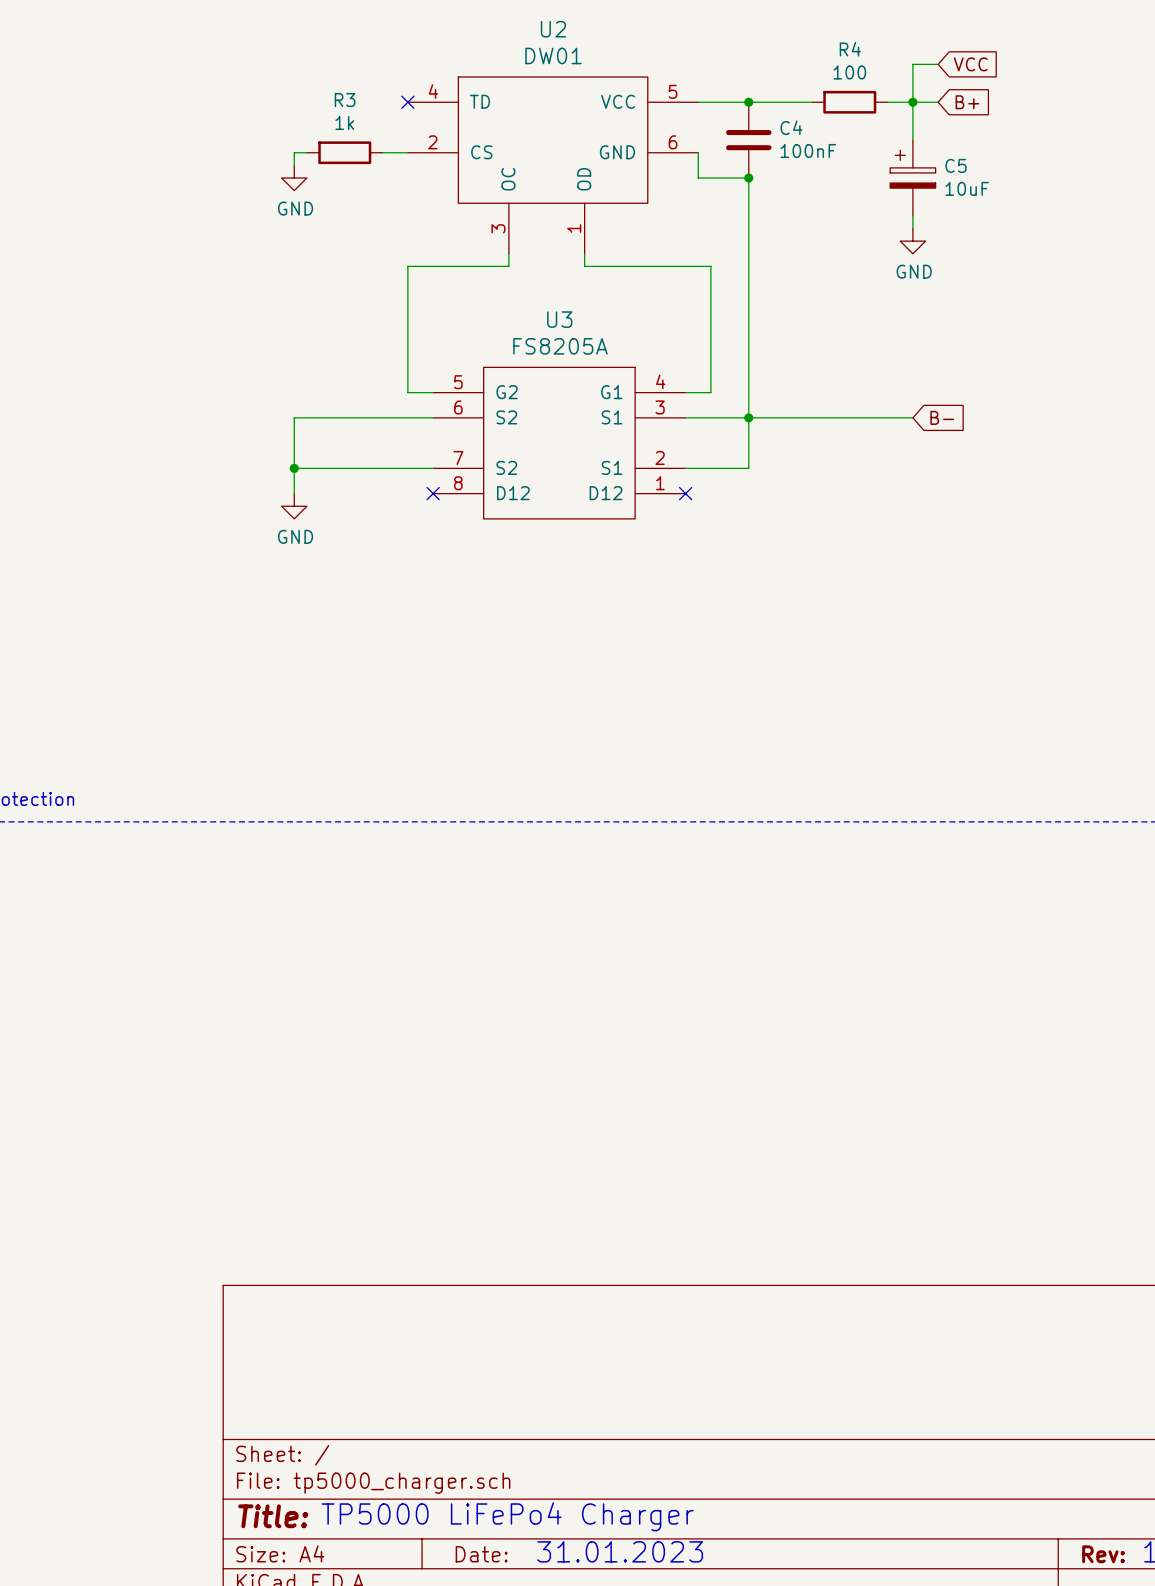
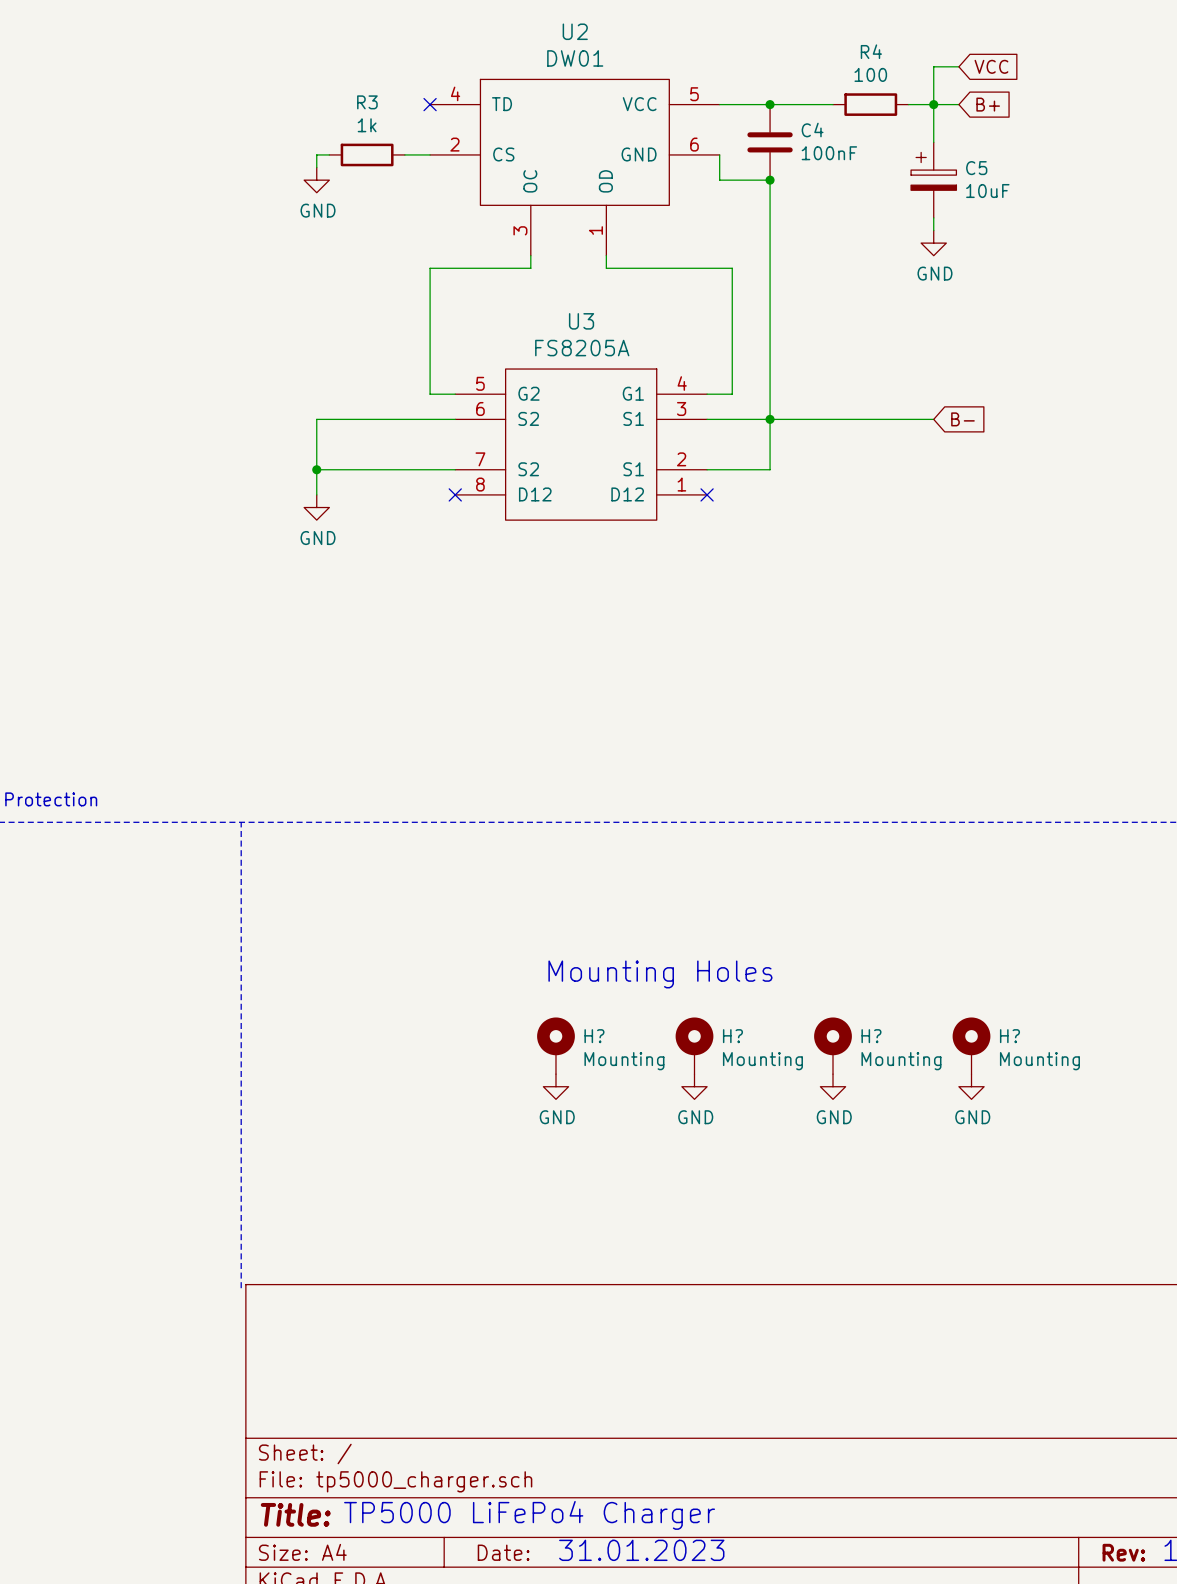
line: none -> (241, 822) (241, 1288)
text: none -> Mounting Holes (660, 974)
H?: none -> Mounting (555, 1045)
H?: none -> Mounting (694, 1045)
H?: none -> Mounting (833, 1045)
H?: none -> Mounting (971, 1045)
power symbol: none -> GND (555, 1086)
power symbol: none -> GND (694, 1086)
power symbol: none -> GND (833, 1086)
power symbol: none -> GND (971, 1086)

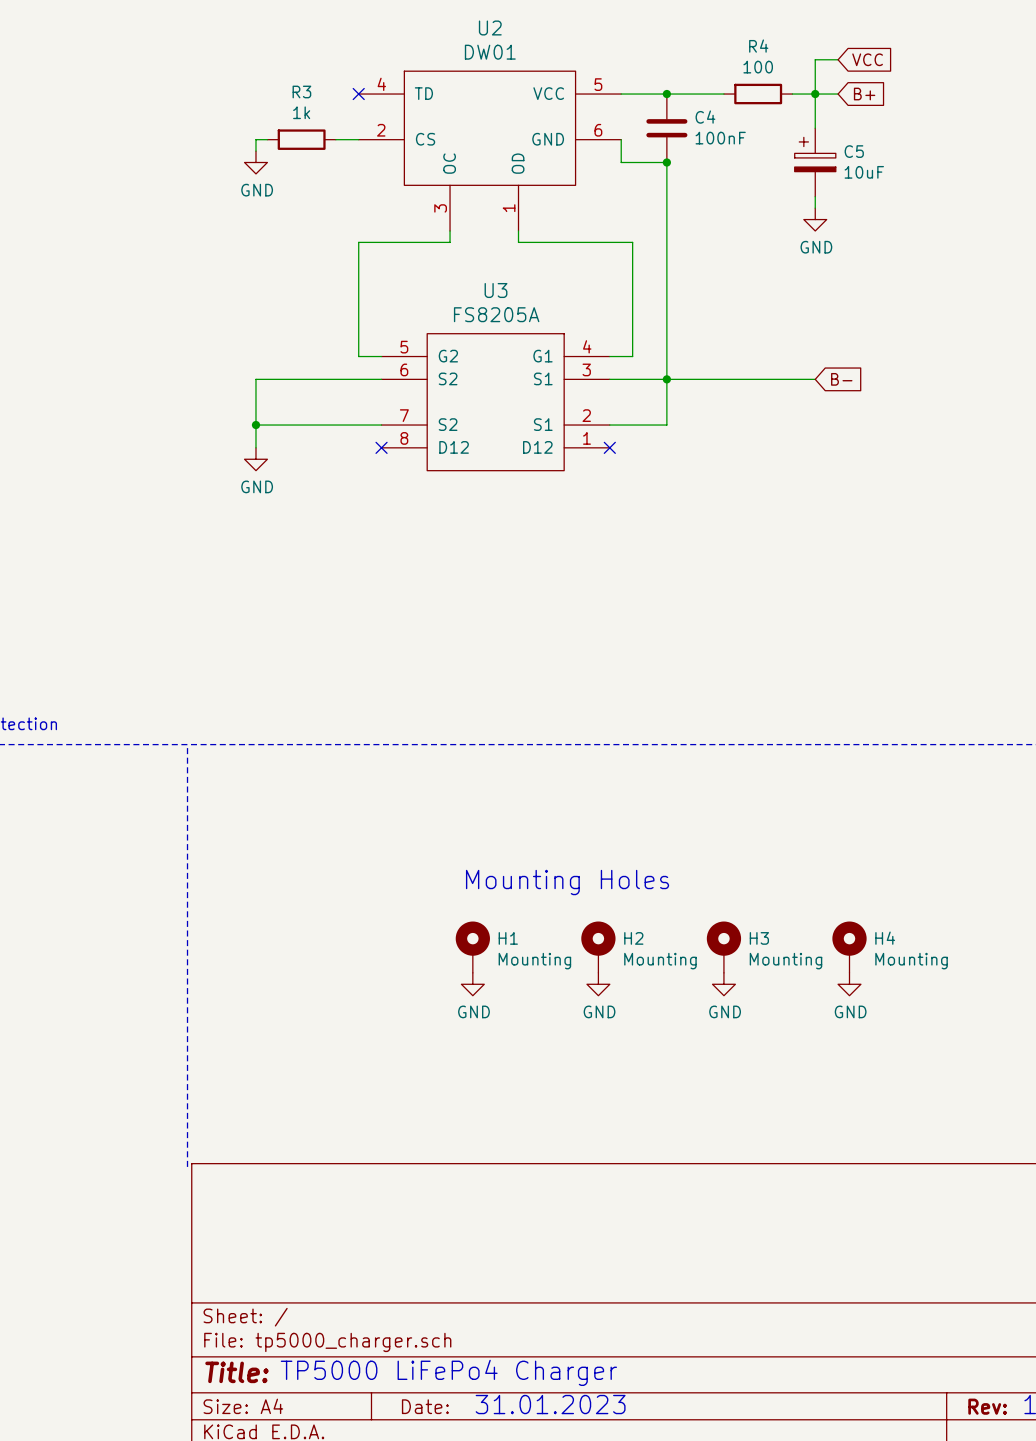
H? name: H? (594, 1036) -> H1 (508, 938)
H? name: H? (732, 1036) -> H2 (633, 938)
H? name: H? (871, 1036) -> H3 (759, 938)
H? name: H? (1009, 1036) -> H4 (885, 938)

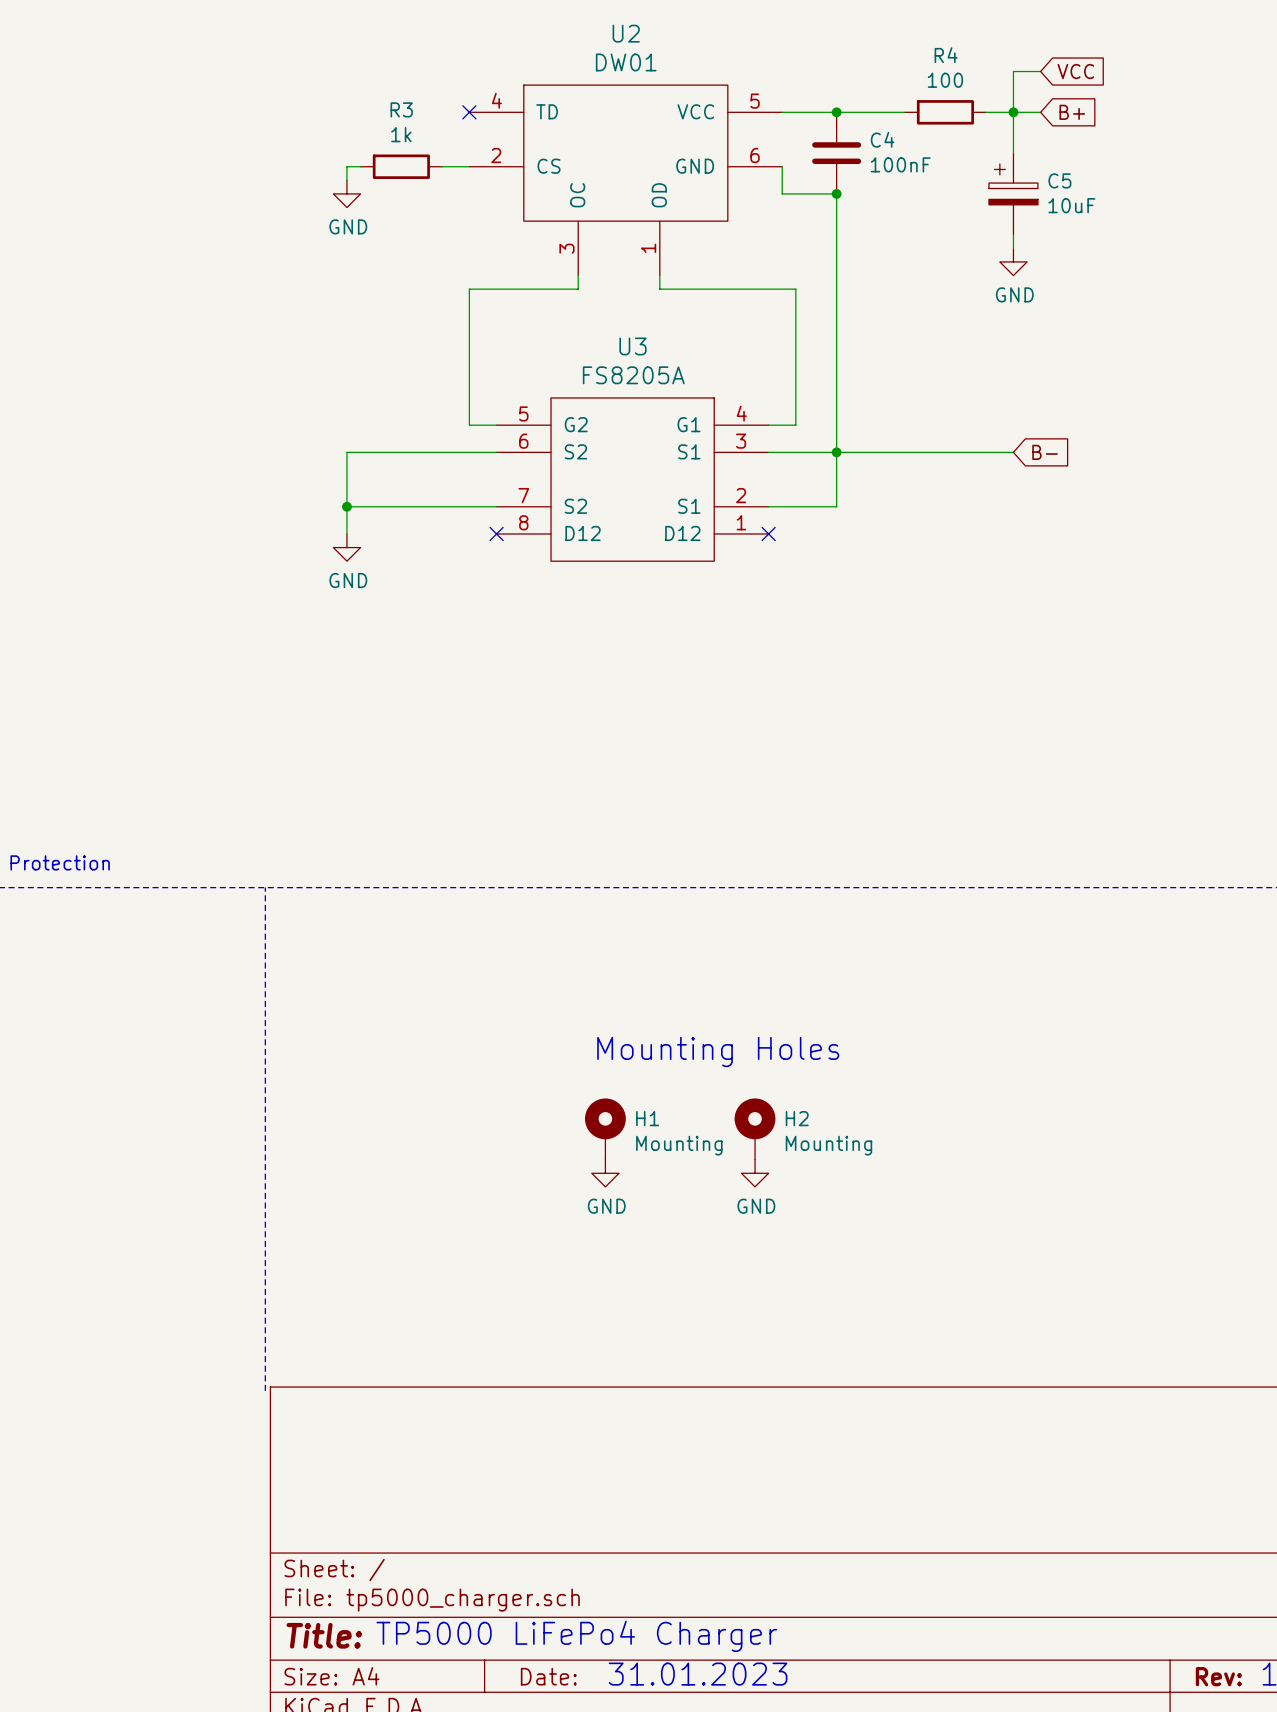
H3: Mounting (723, 947) -> none
H4: Mounting (849, 947) -> none
power symbol: GND (723, 984) -> none
power symbol: GND (849, 984) -> none

